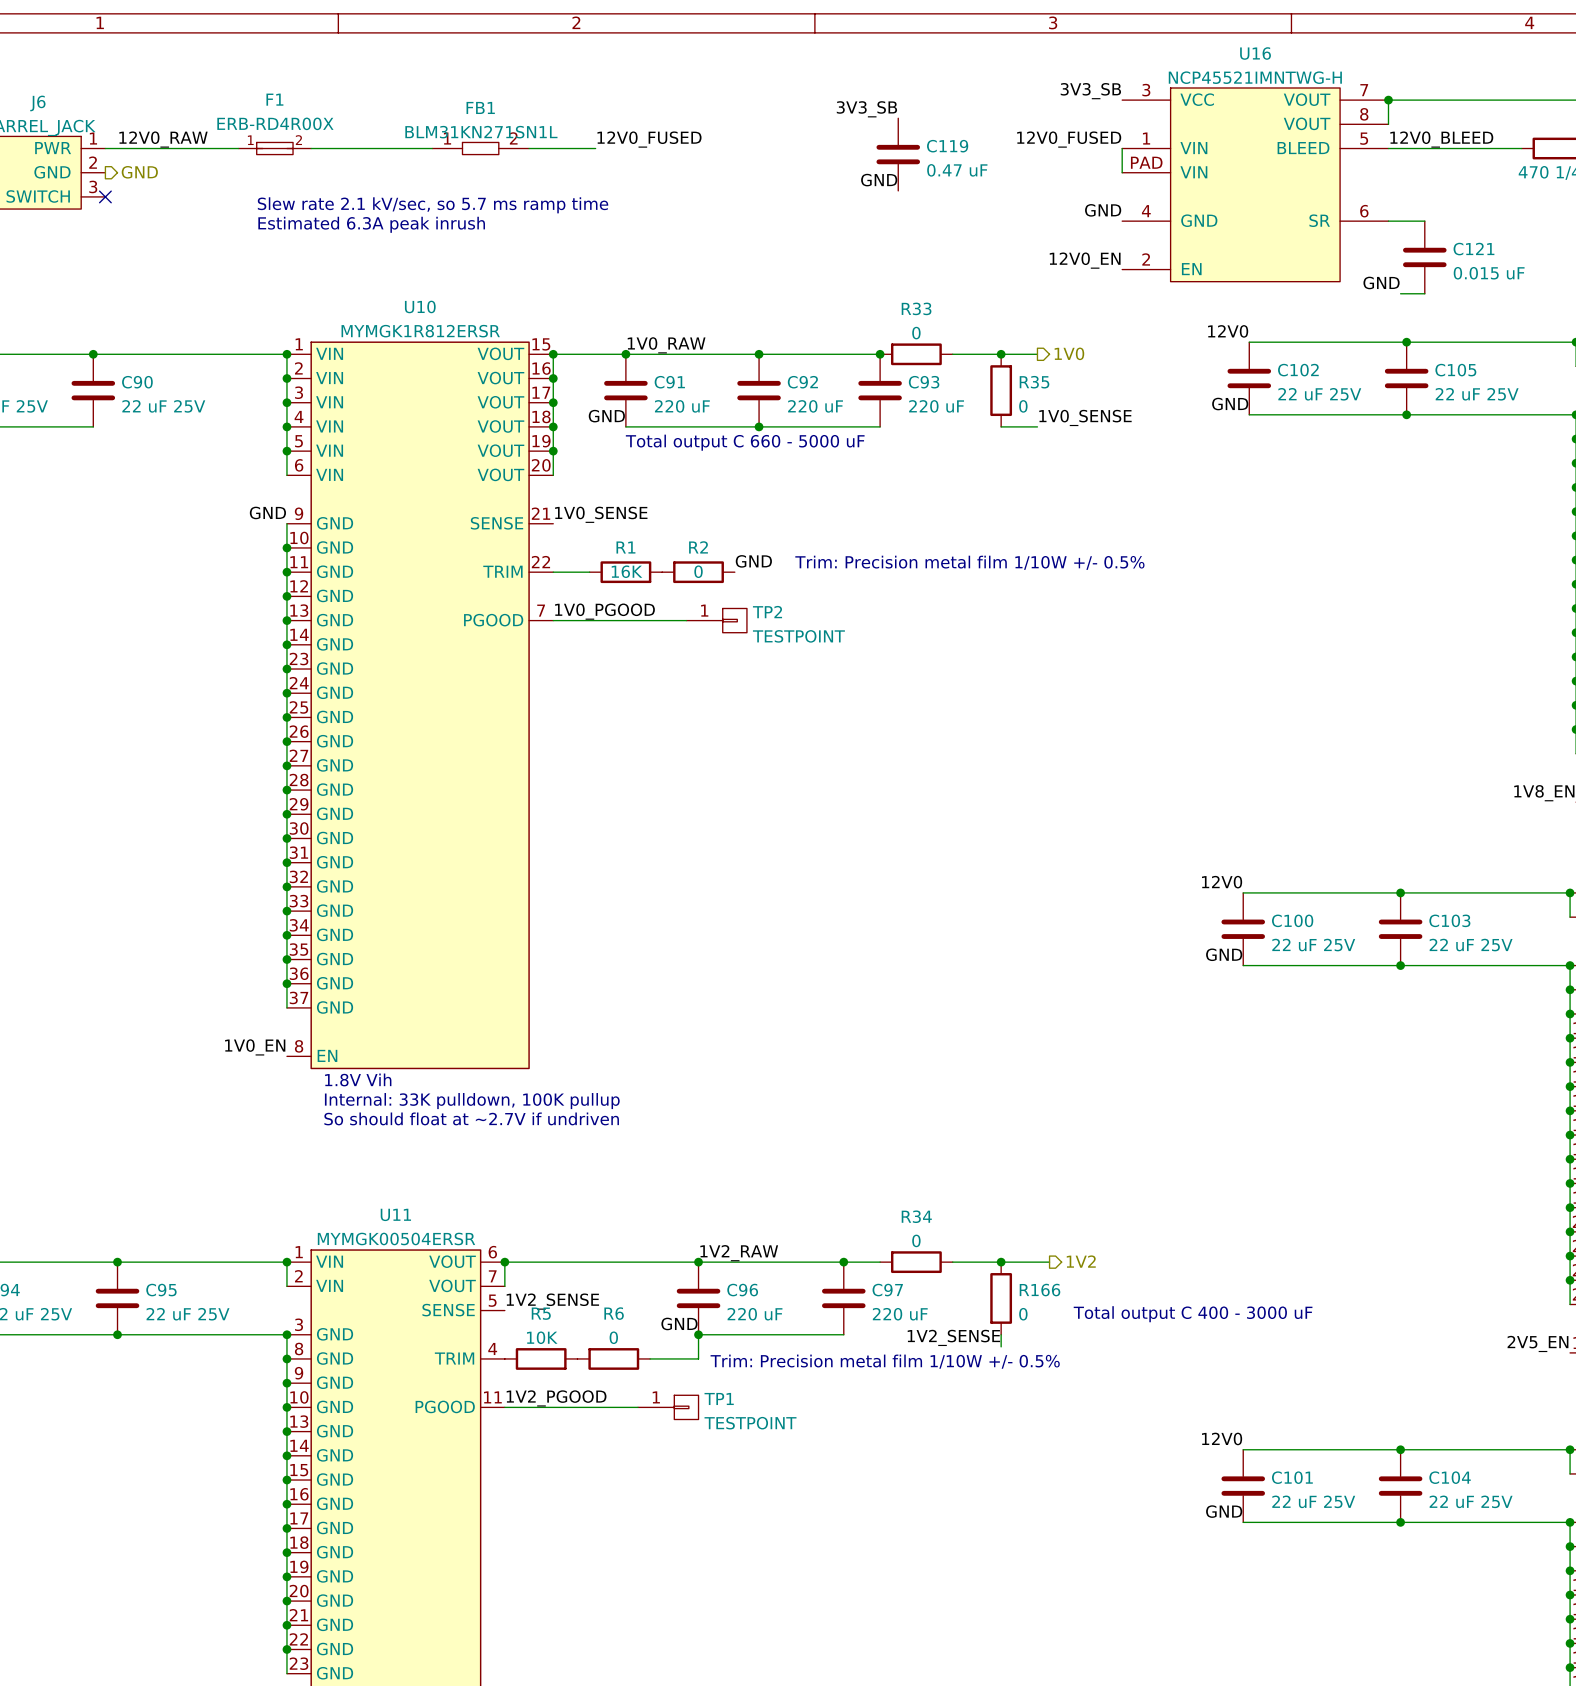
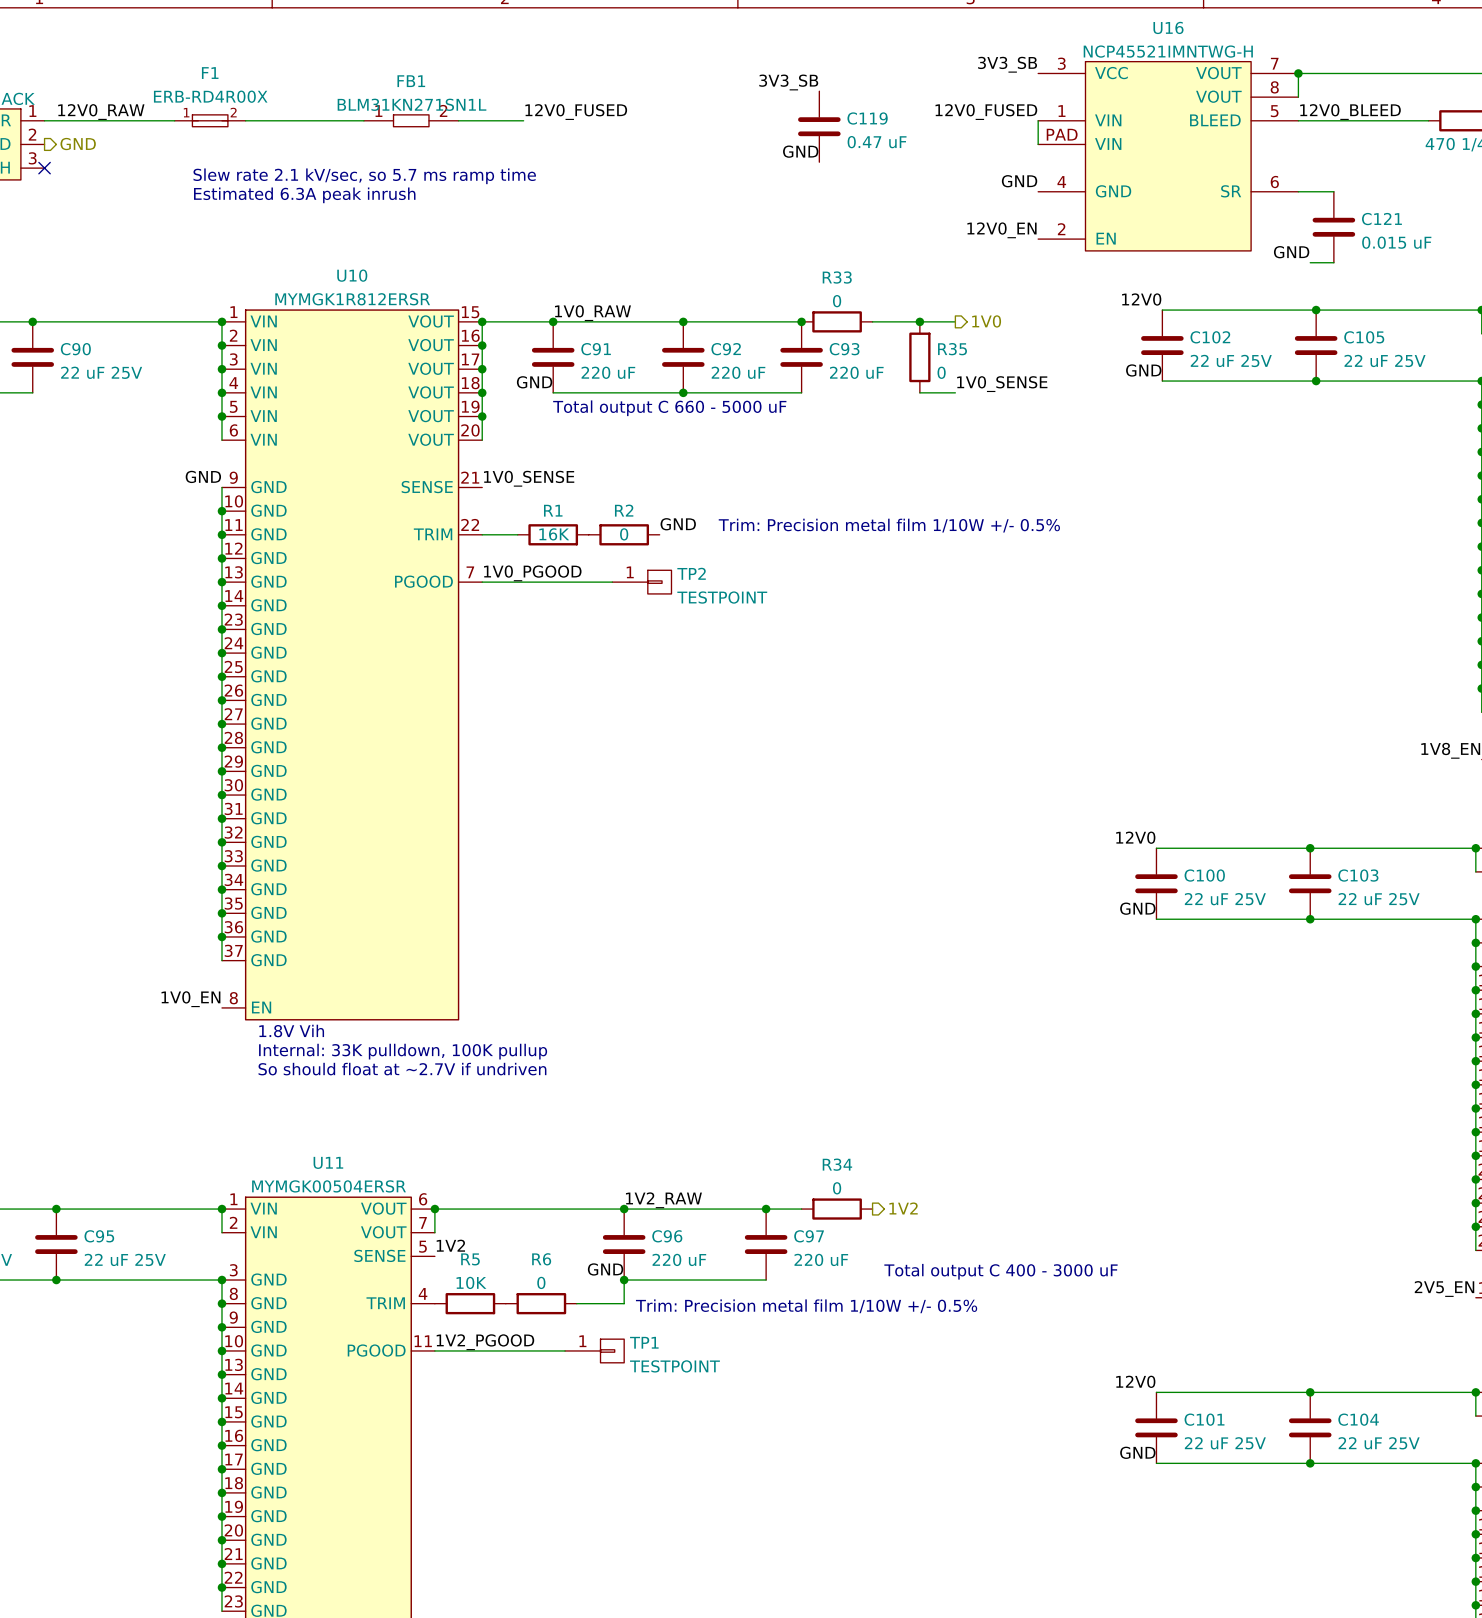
hierarchical label position: 1V2 (1081, 1261) -> 1V2 (903, 1208)
wire: (952, 1262) (1049, 1262) -> none
junction: (1001, 1262) -> none
R166: 0 (1001, 1298) -> none
label: 1V2_SENSE (552, 1301) -> 1V2 (450, 1245)
text position: Total output C 400 - 3000 uF (1193, 1314) -> Total output C 400 - 3000 uF (1000, 1271)
wire: (1001, 1334) (1001, 1346) -> none
label: 1V2_SENSE (953, 1337) -> none

